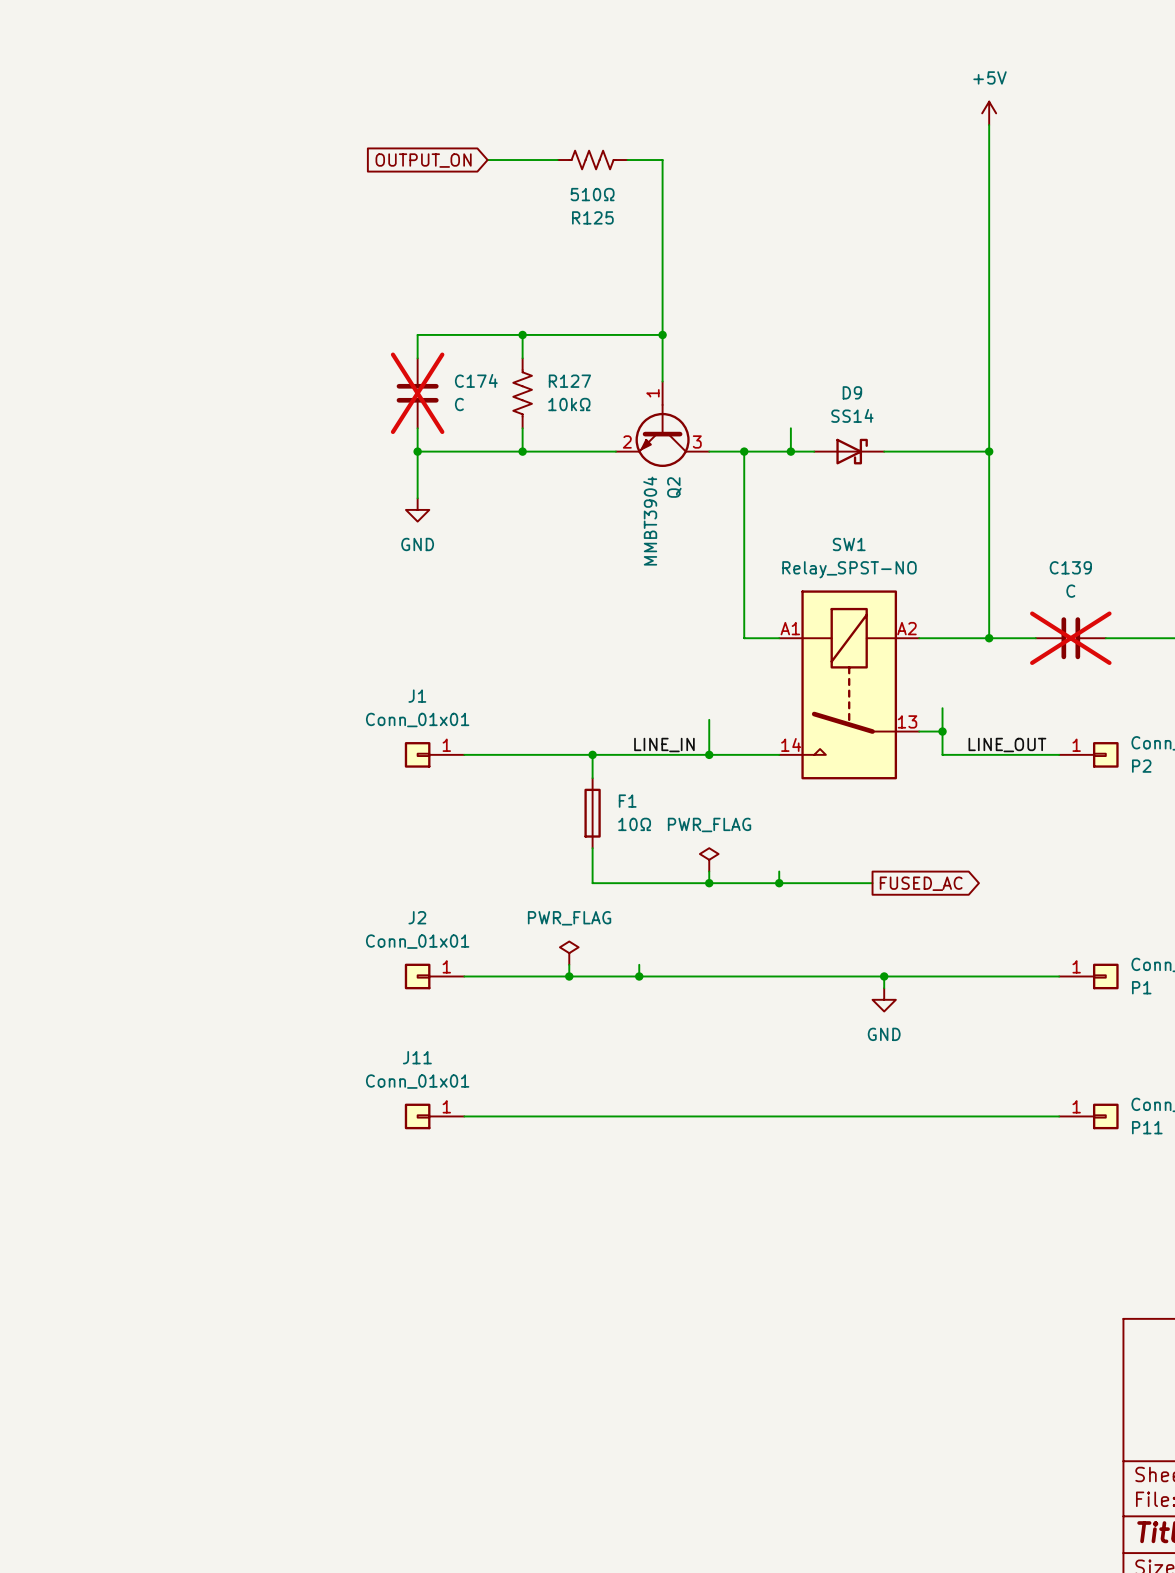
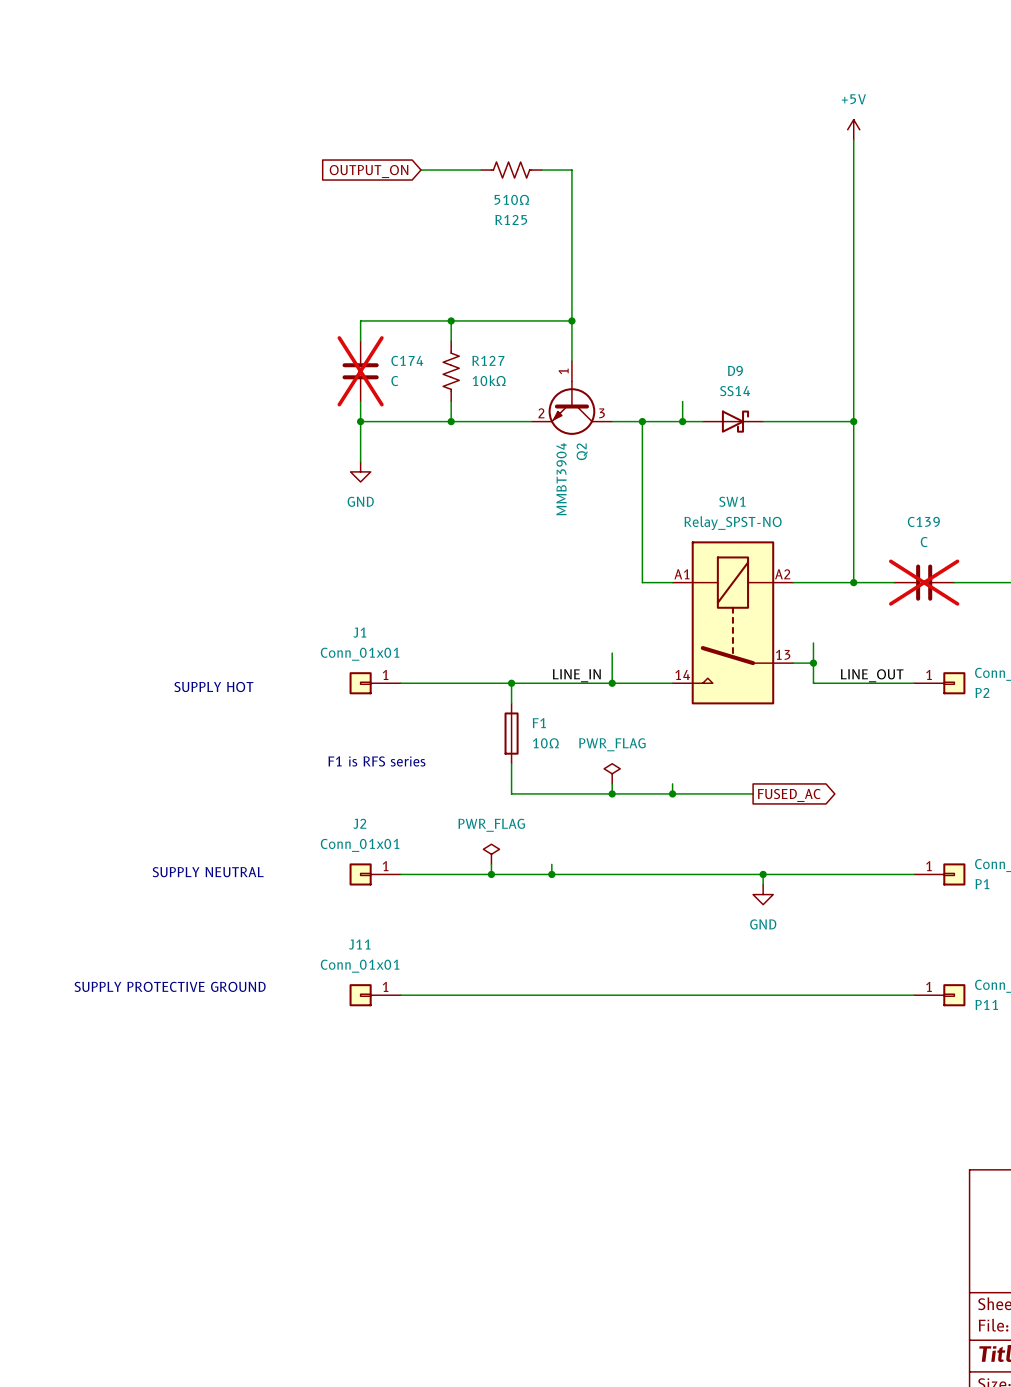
text: none -> SUPPLY HOT (213, 686)
text: none -> F1 is RFS series (376, 761)
text: none -> SUPPLY NEUTRAL (208, 872)
text: none -> SUPPLY PROTECTIVE GROUND (170, 986)

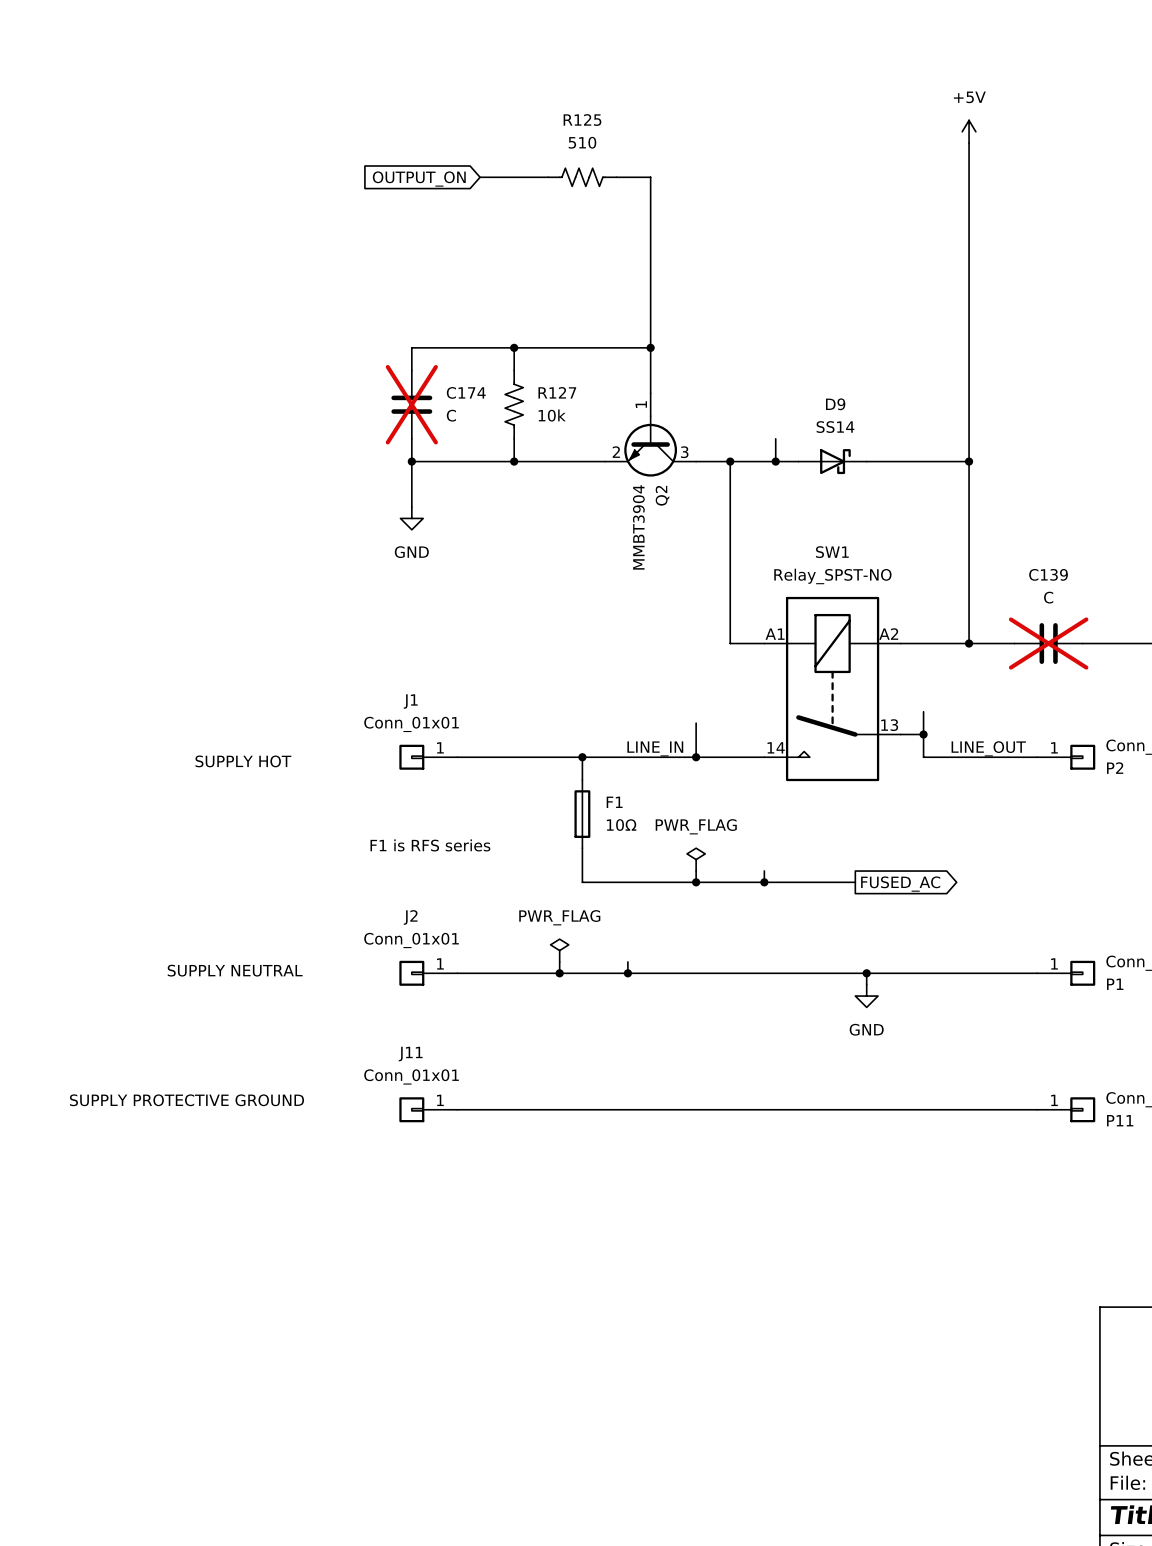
R125 value: 510Ω (511, 199) -> 510 (582, 142)
R125 name position: R125 (511, 219) -> R125 (582, 120)
R127 value: 10kΩ (489, 380) -> 10k (552, 415)

